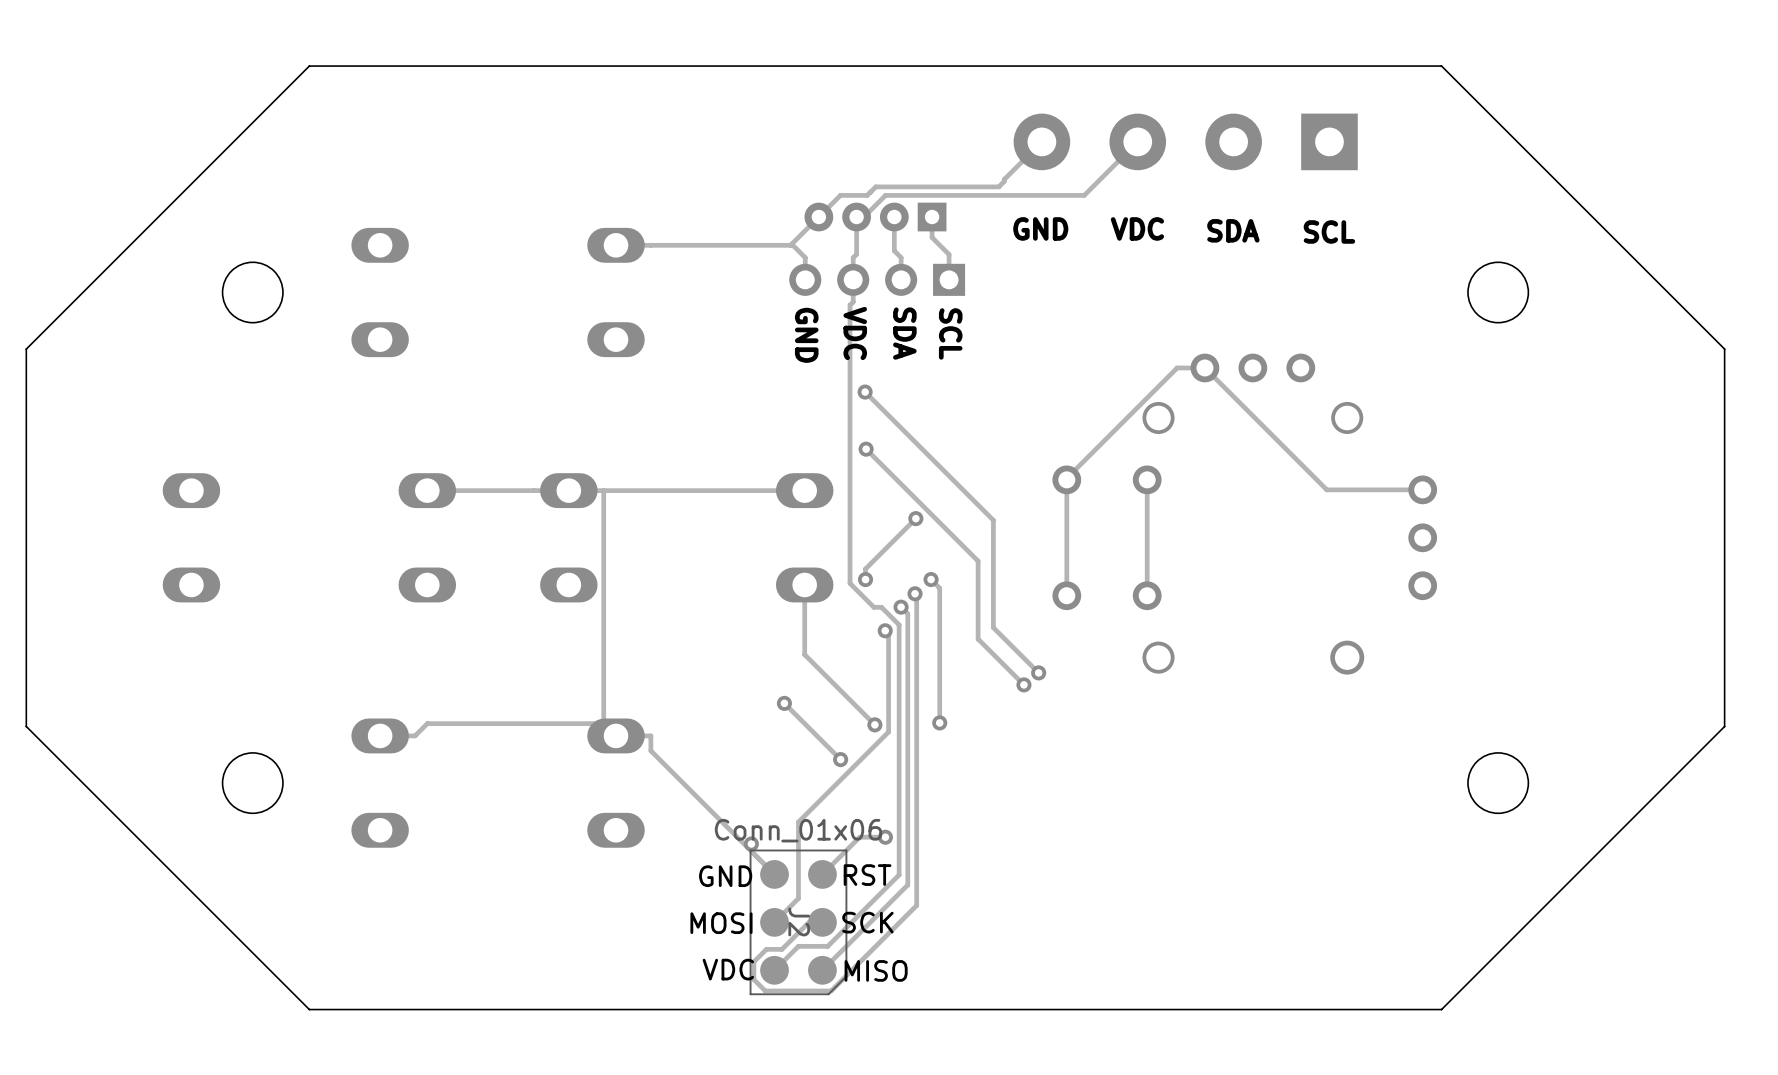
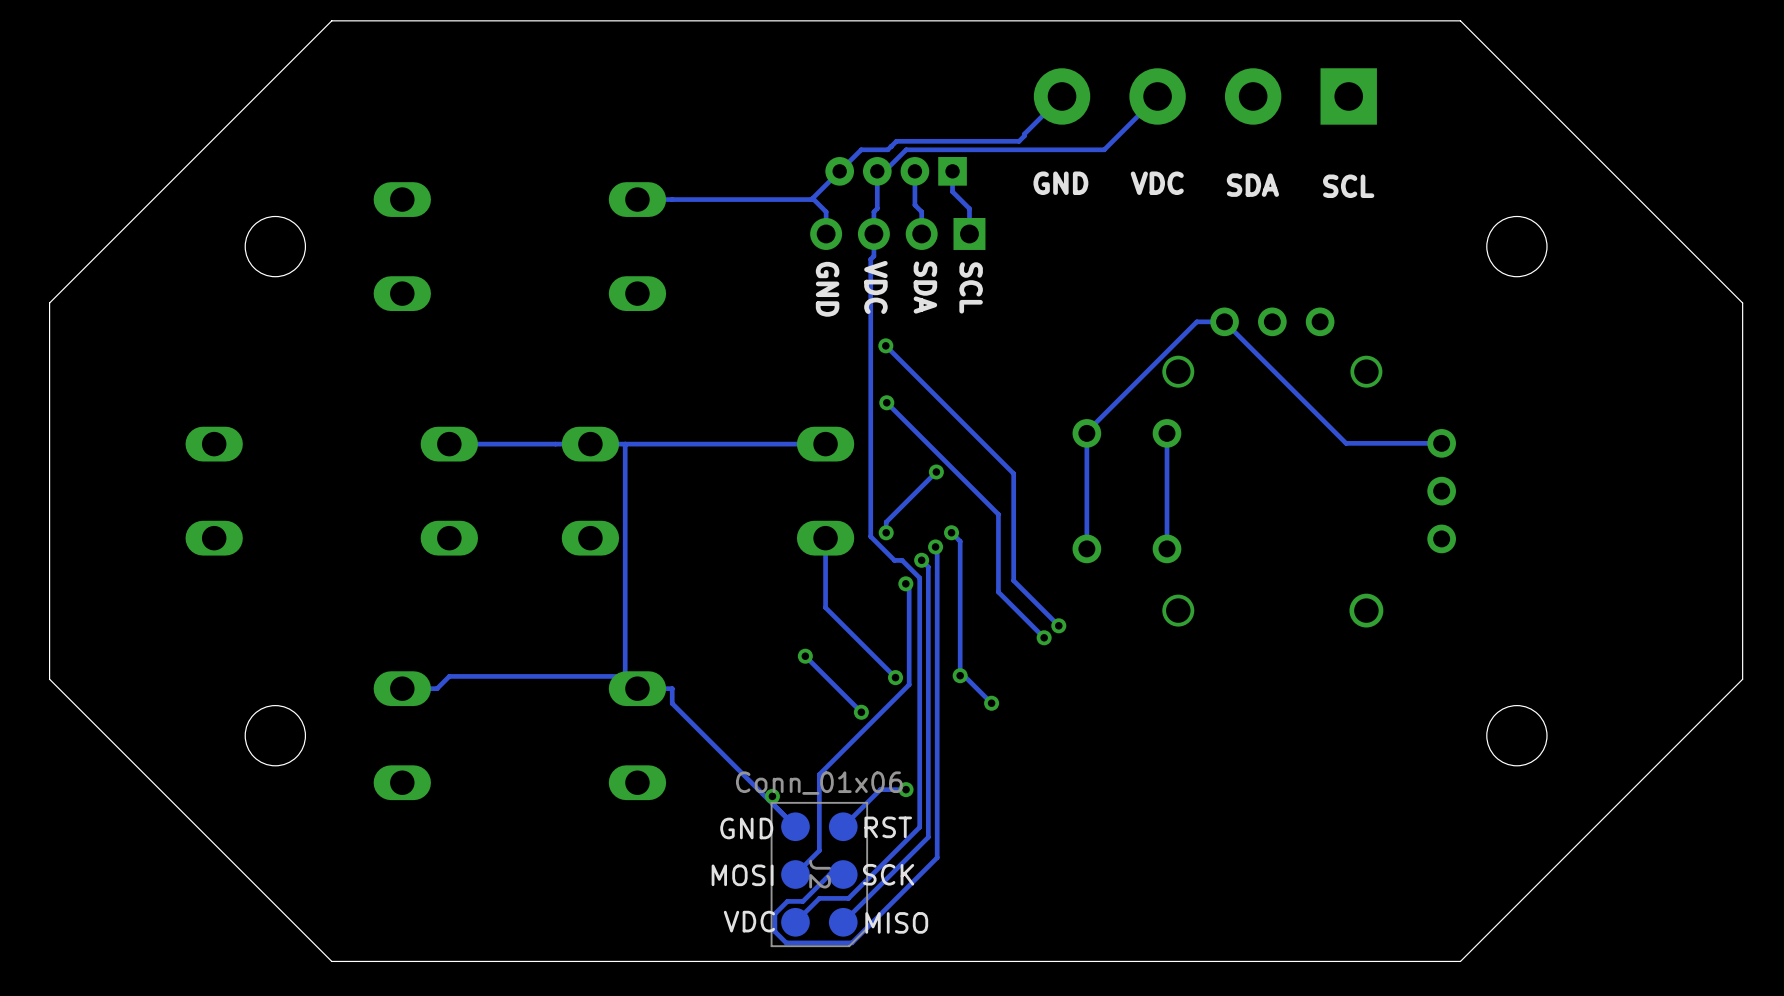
track: none -> (960, 675) (964, 675) (991, 703)
via: none -> (991, 703)

